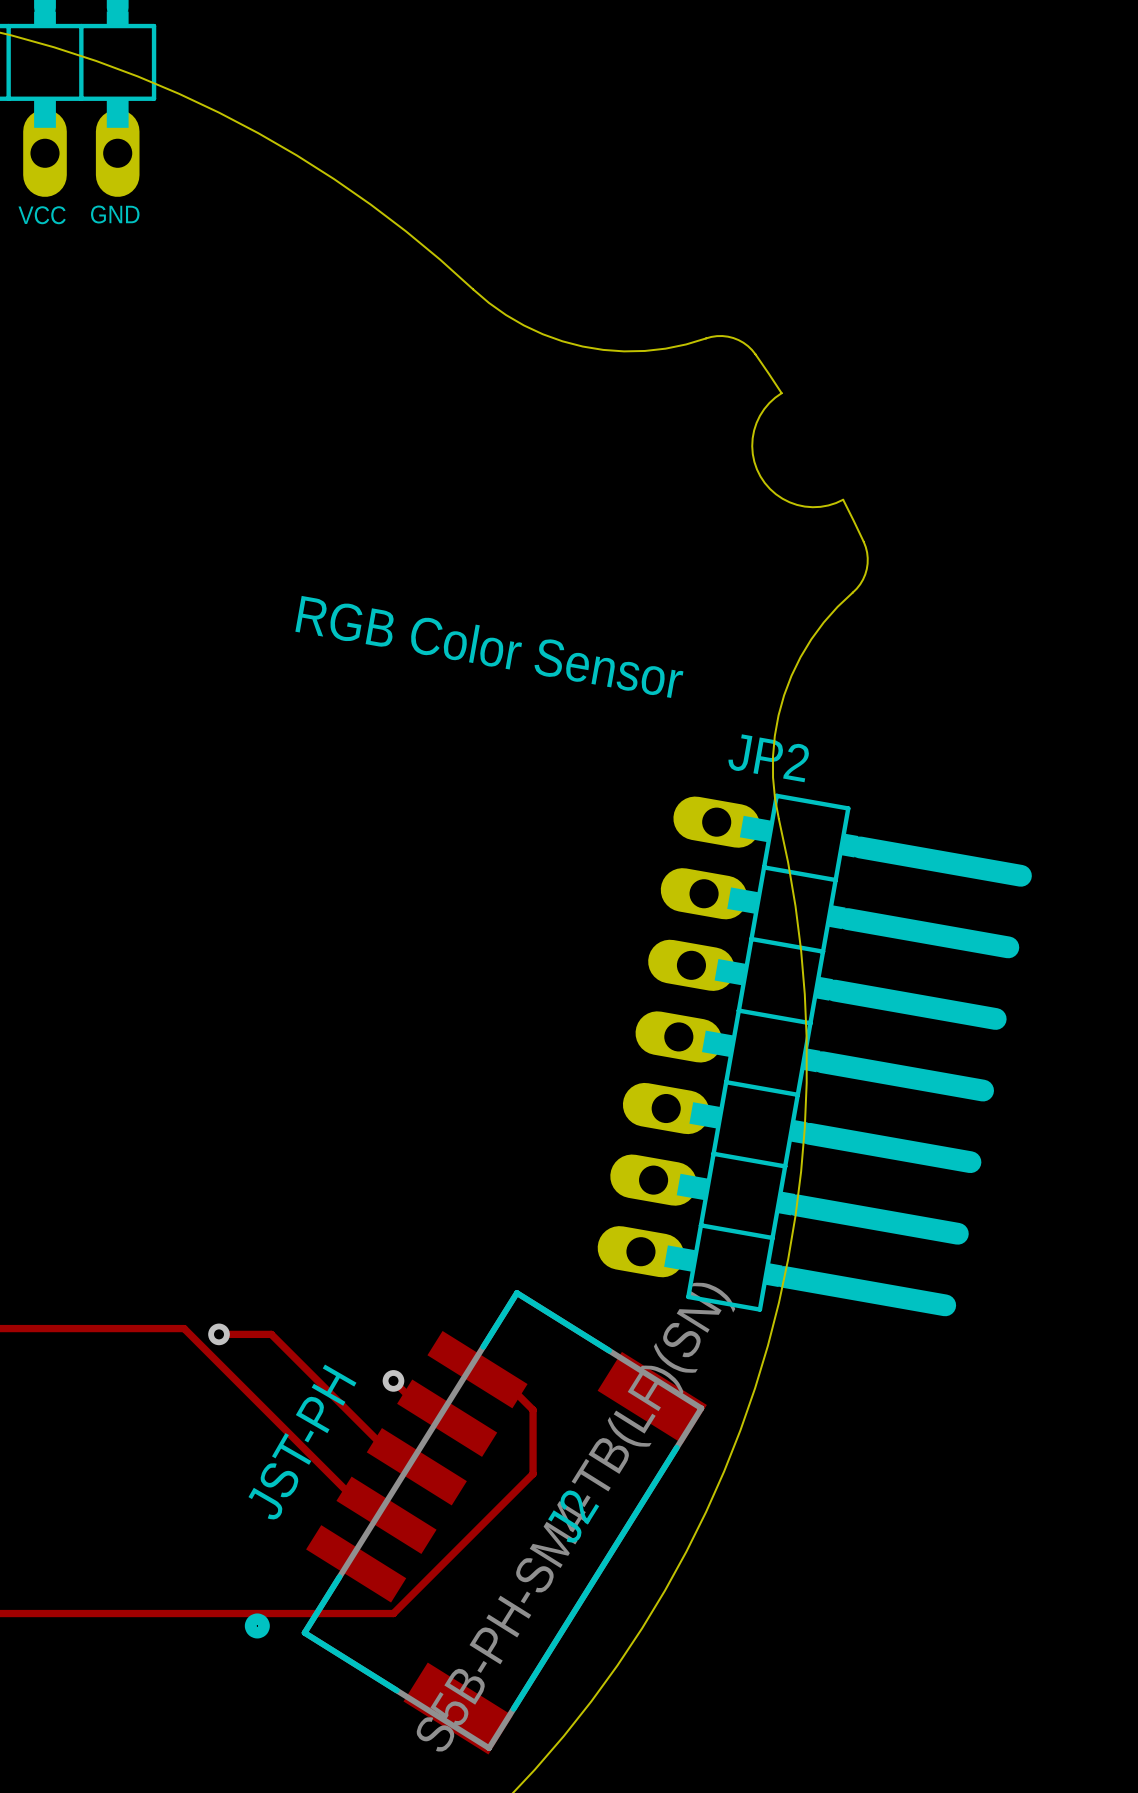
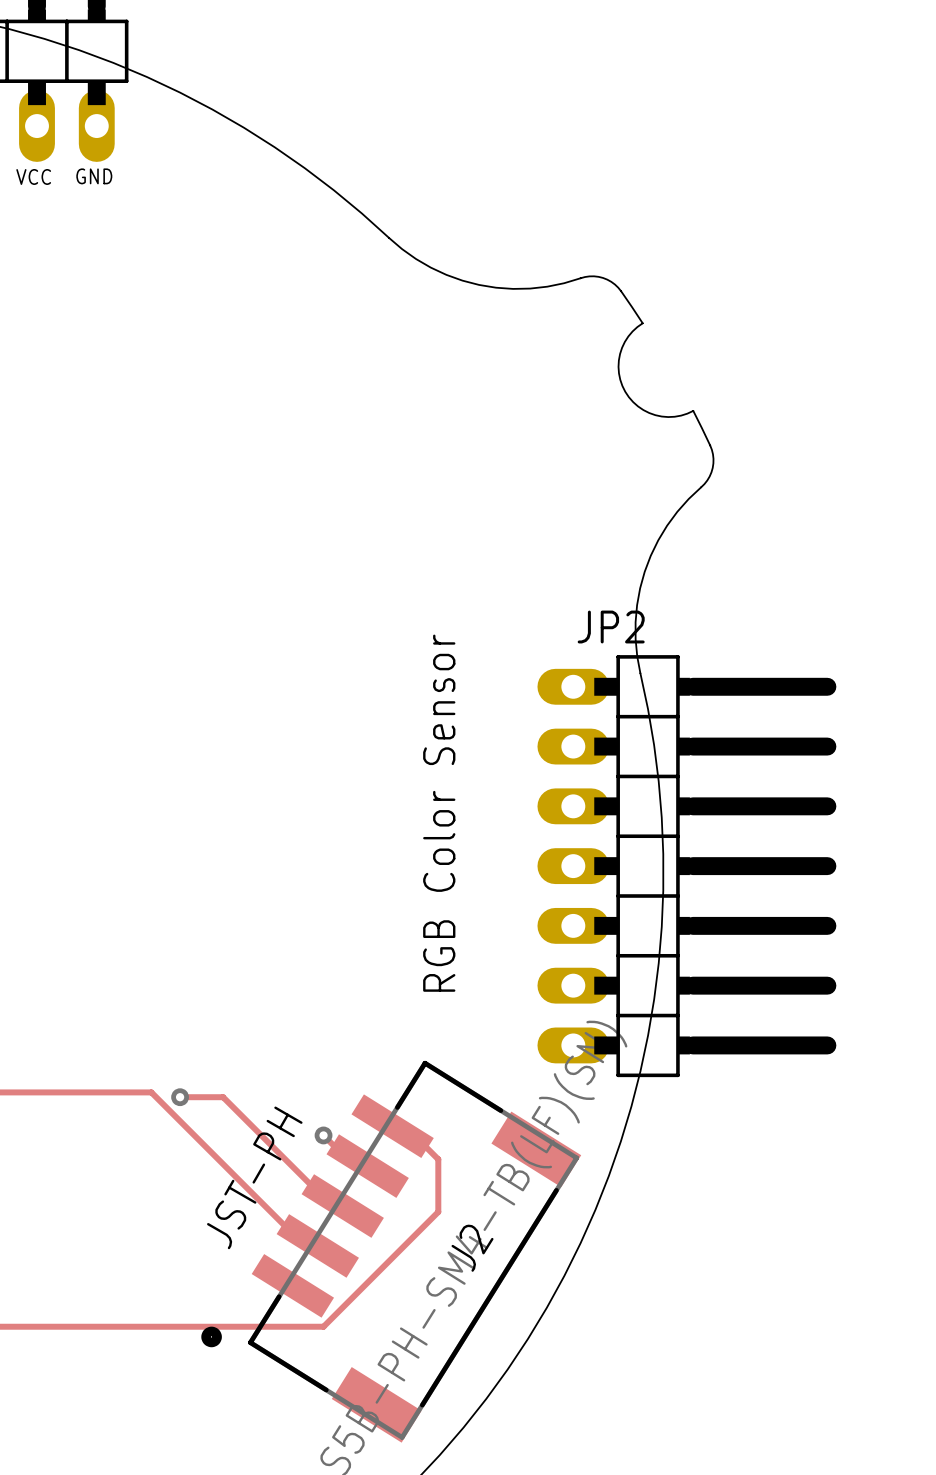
text rotation: 0° (489, 646) -> 100° counterclockwise (439, 813)
JP2 rotation: 0° (814, 1054) -> 10° counterclockwise (686, 866)

